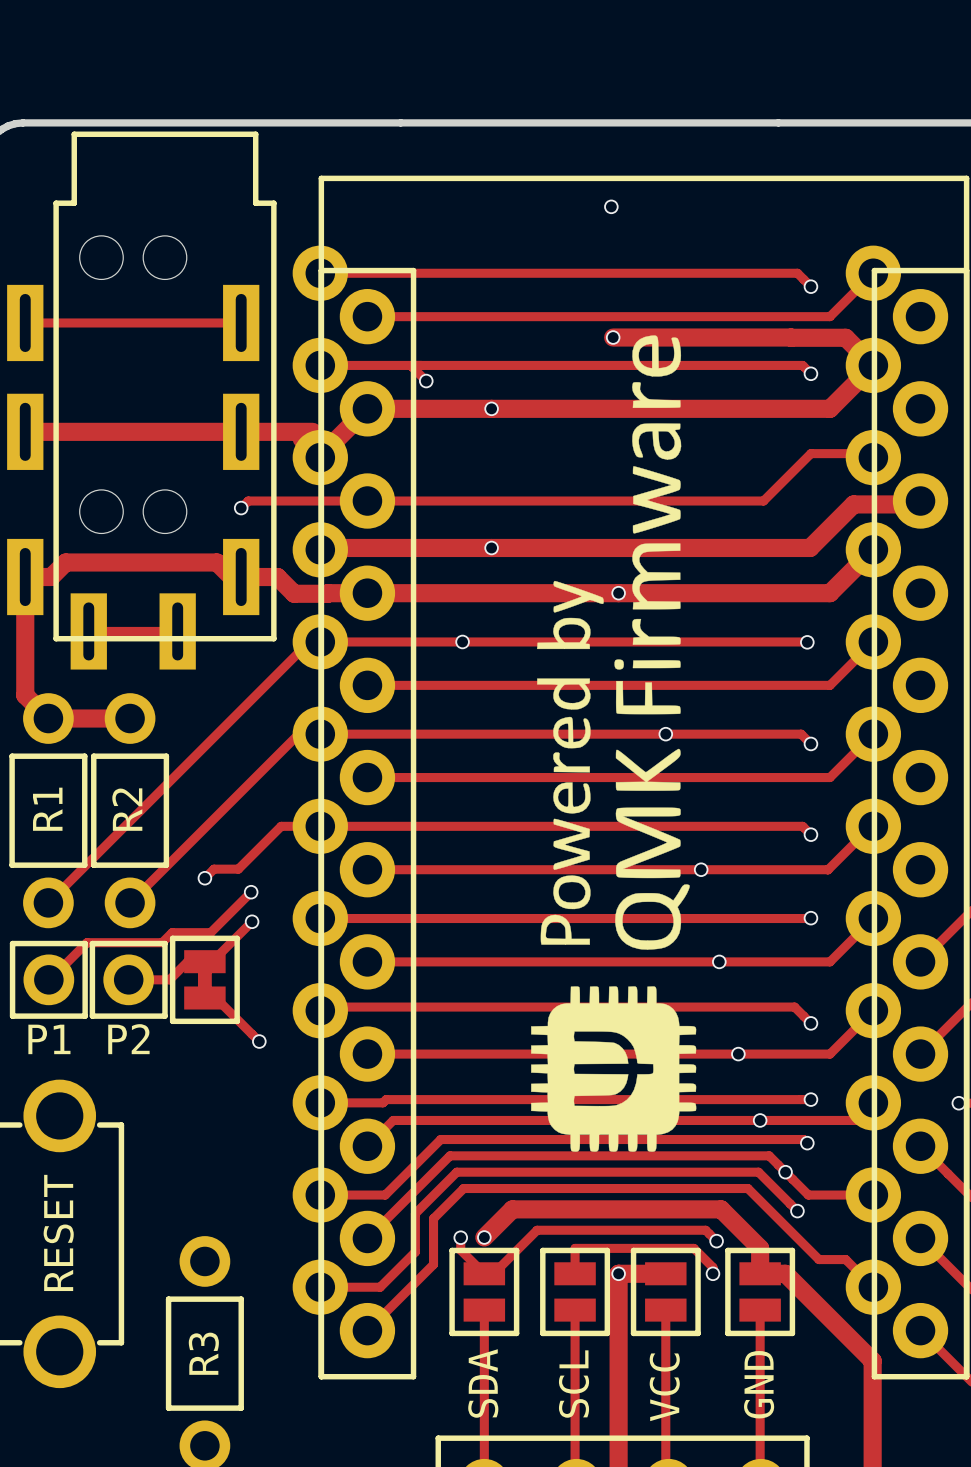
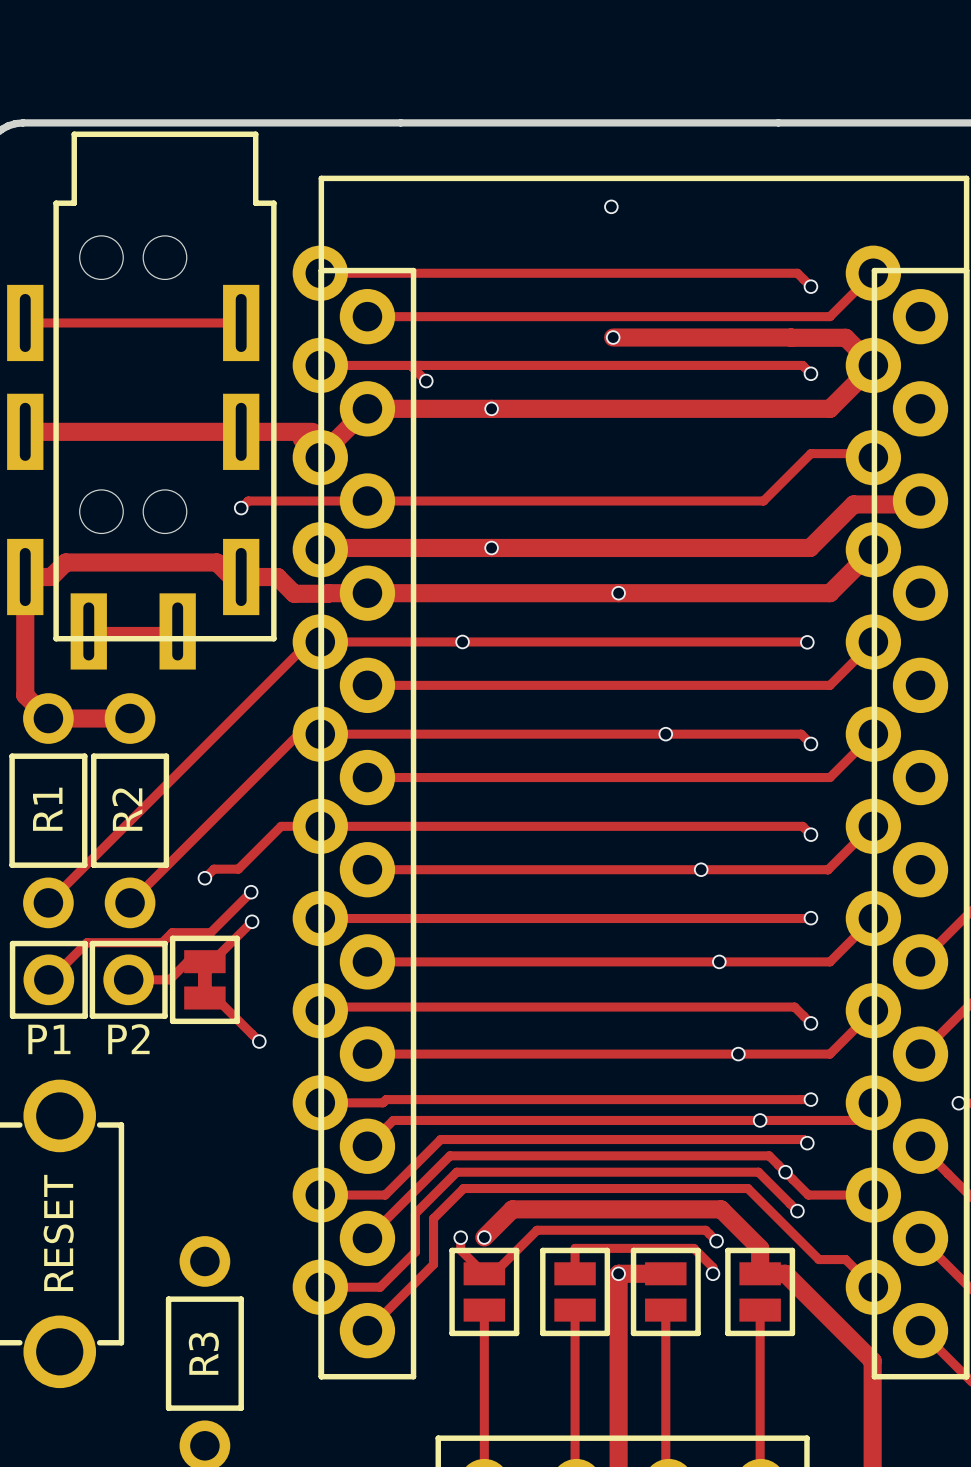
drawing: [531, 335, 697, 1152] -> none
text: SDA (483, 1383) -> none
text: SCL (574, 1384) -> none
text: GND (759, 1384) -> none
text: VCC (664, 1387) -> none

